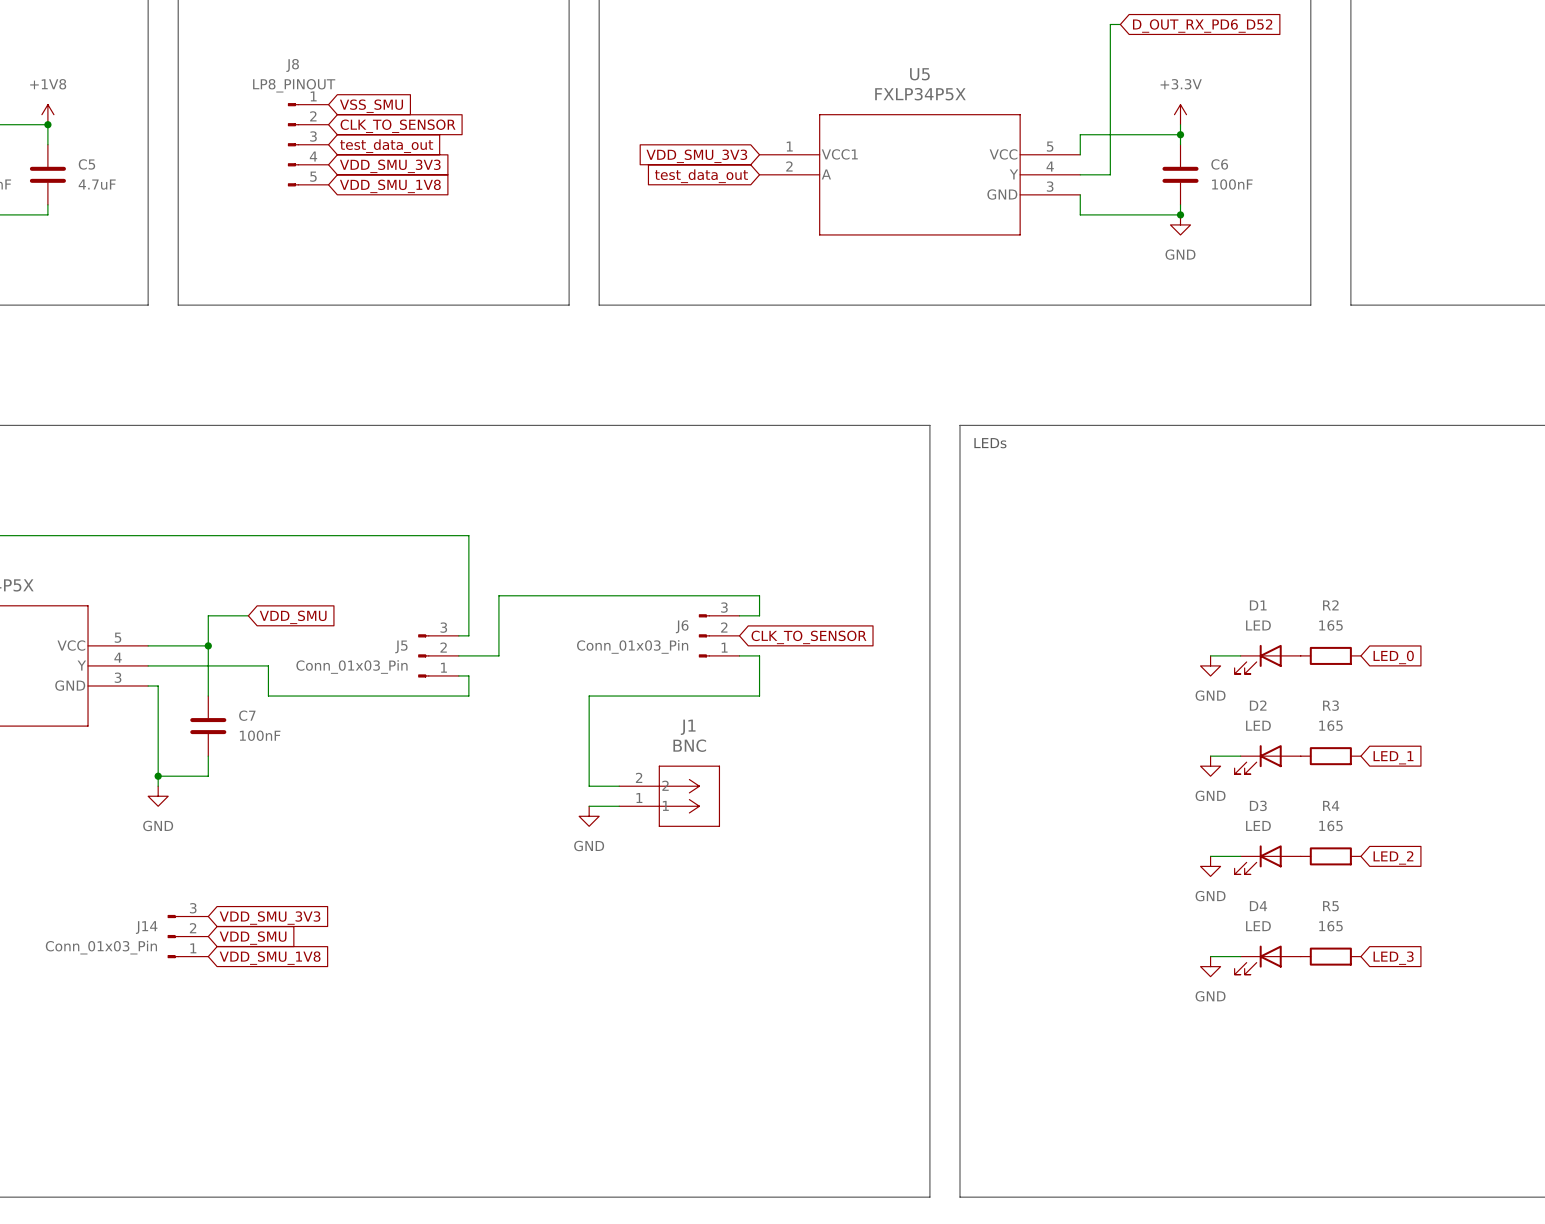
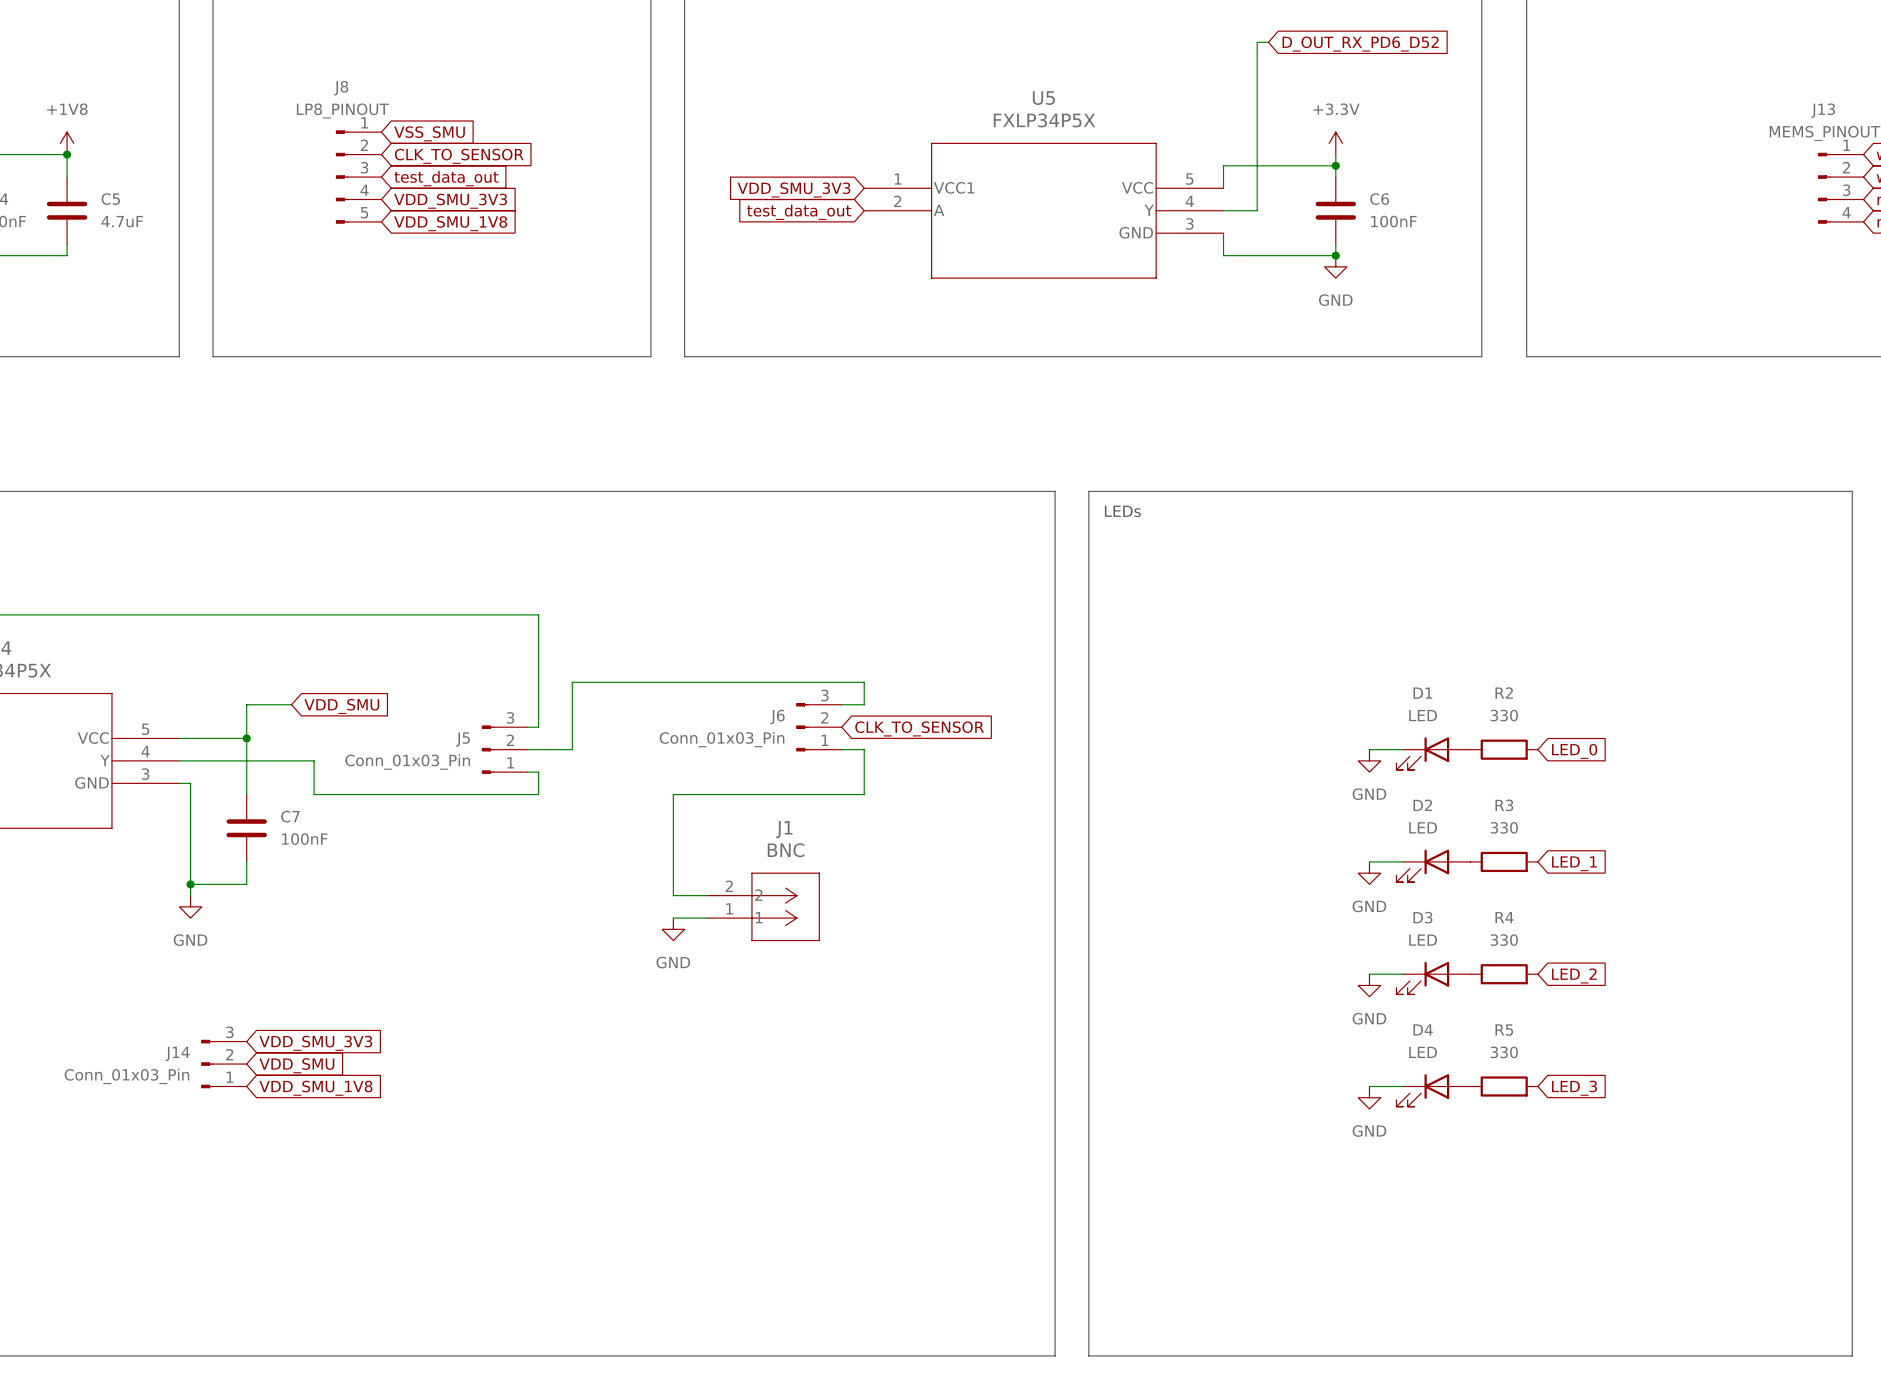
R2 value: 165 (1331, 625) -> 330 (1504, 715)
R3 value: 165 (1331, 725) -> 330 (1504, 827)
R4 value: 165 (1331, 825) -> 330 (1504, 940)
R5 value: 165 (1331, 926) -> 330 (1504, 1052)

